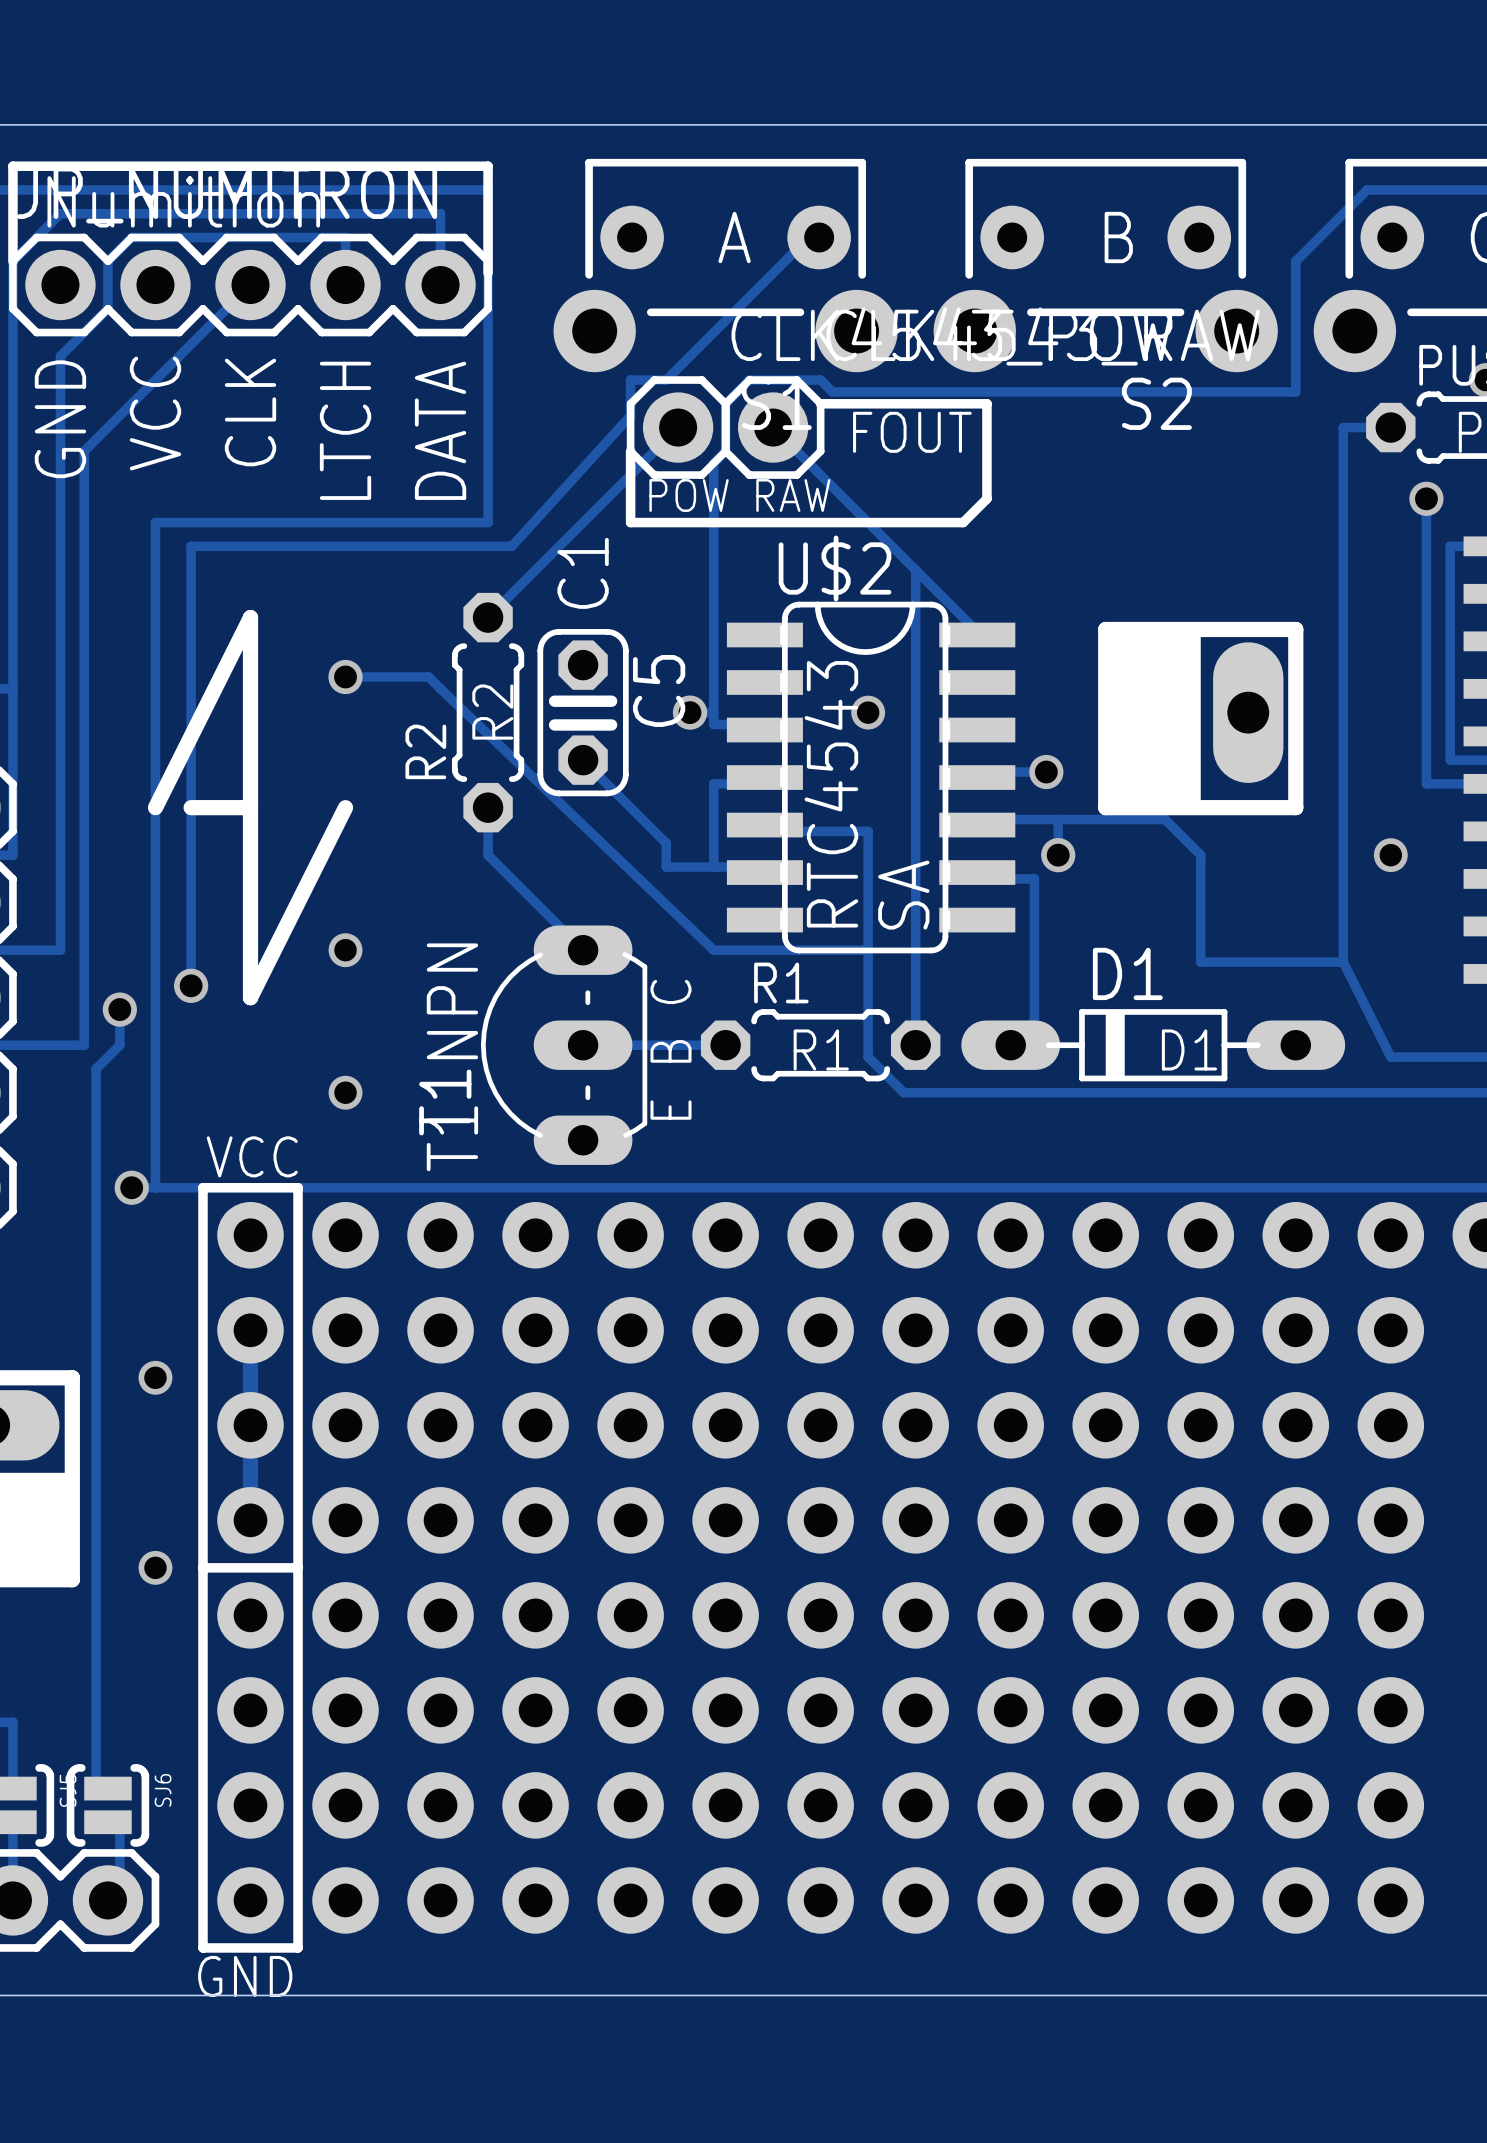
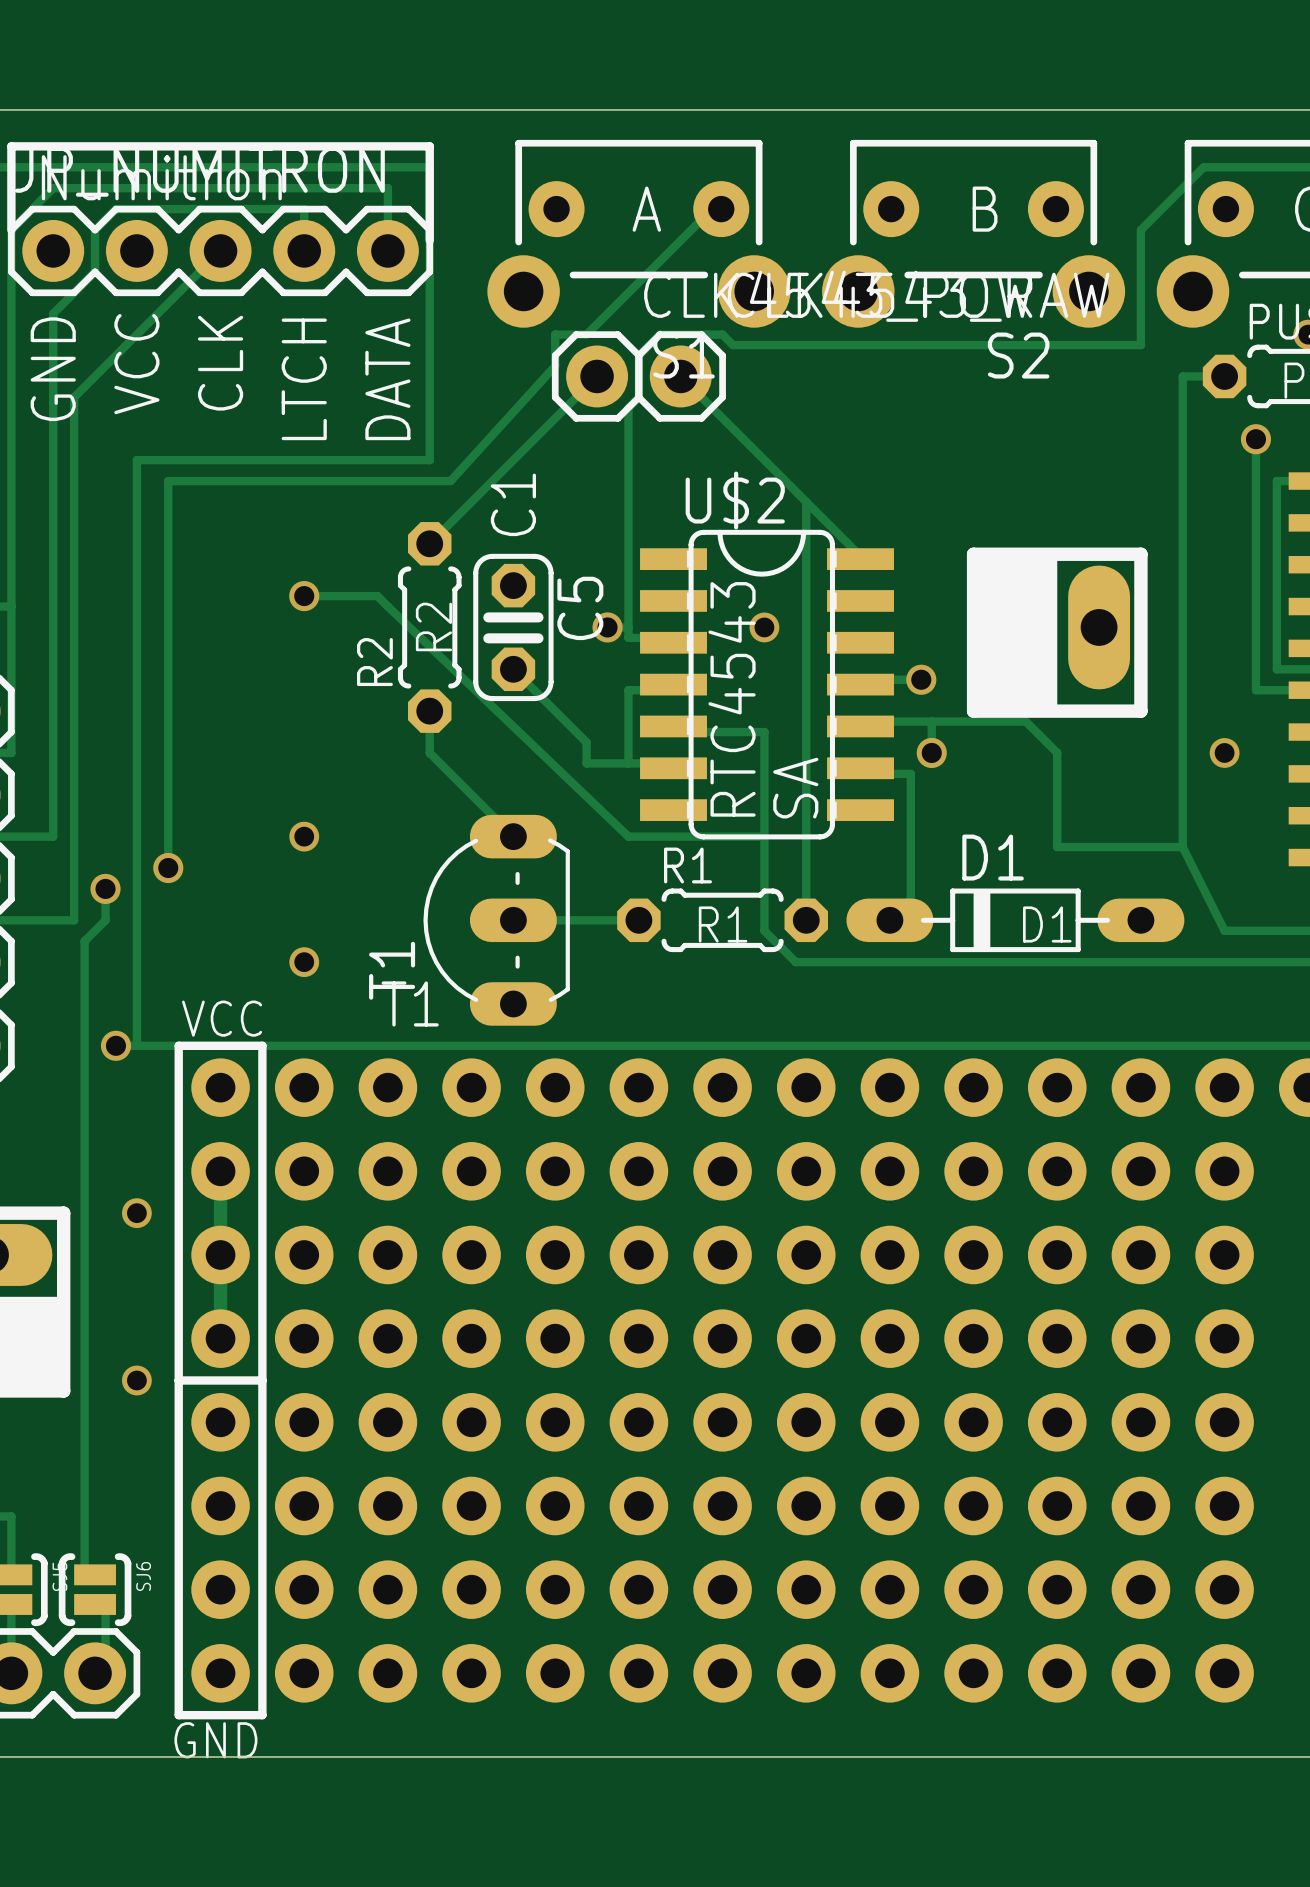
line: (820, 403) (986, 403) (986, 498) (963, 522) (630, 522) (630, 451) -> none
text: FOUT (912, 432) -> none
text: POW (689, 495) -> none
text: RAW (793, 495) -> none
line: (155, 807) (250, 617) (250, 997) (345, 807) -> none
line: (191, 807) (250, 807) -> none
text: E B C (670, 1049) -> none
text: T1 NPN (452, 1057) -> none
text: none -> T1 (410, 1003)

